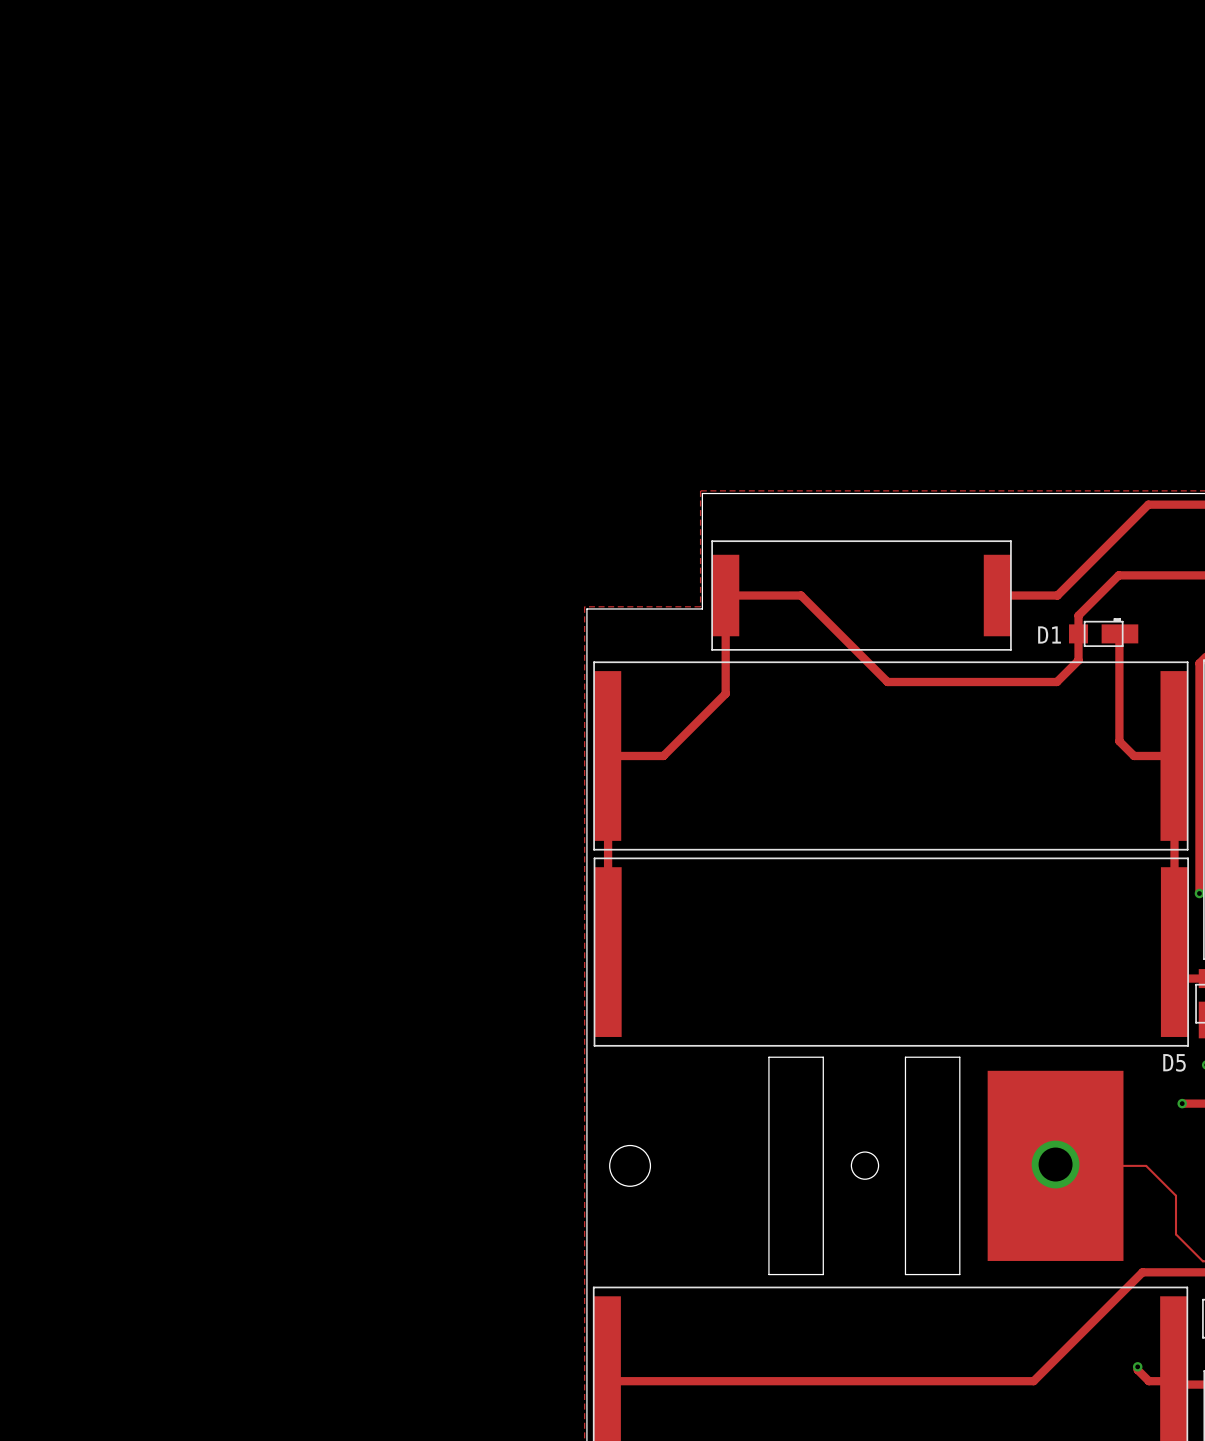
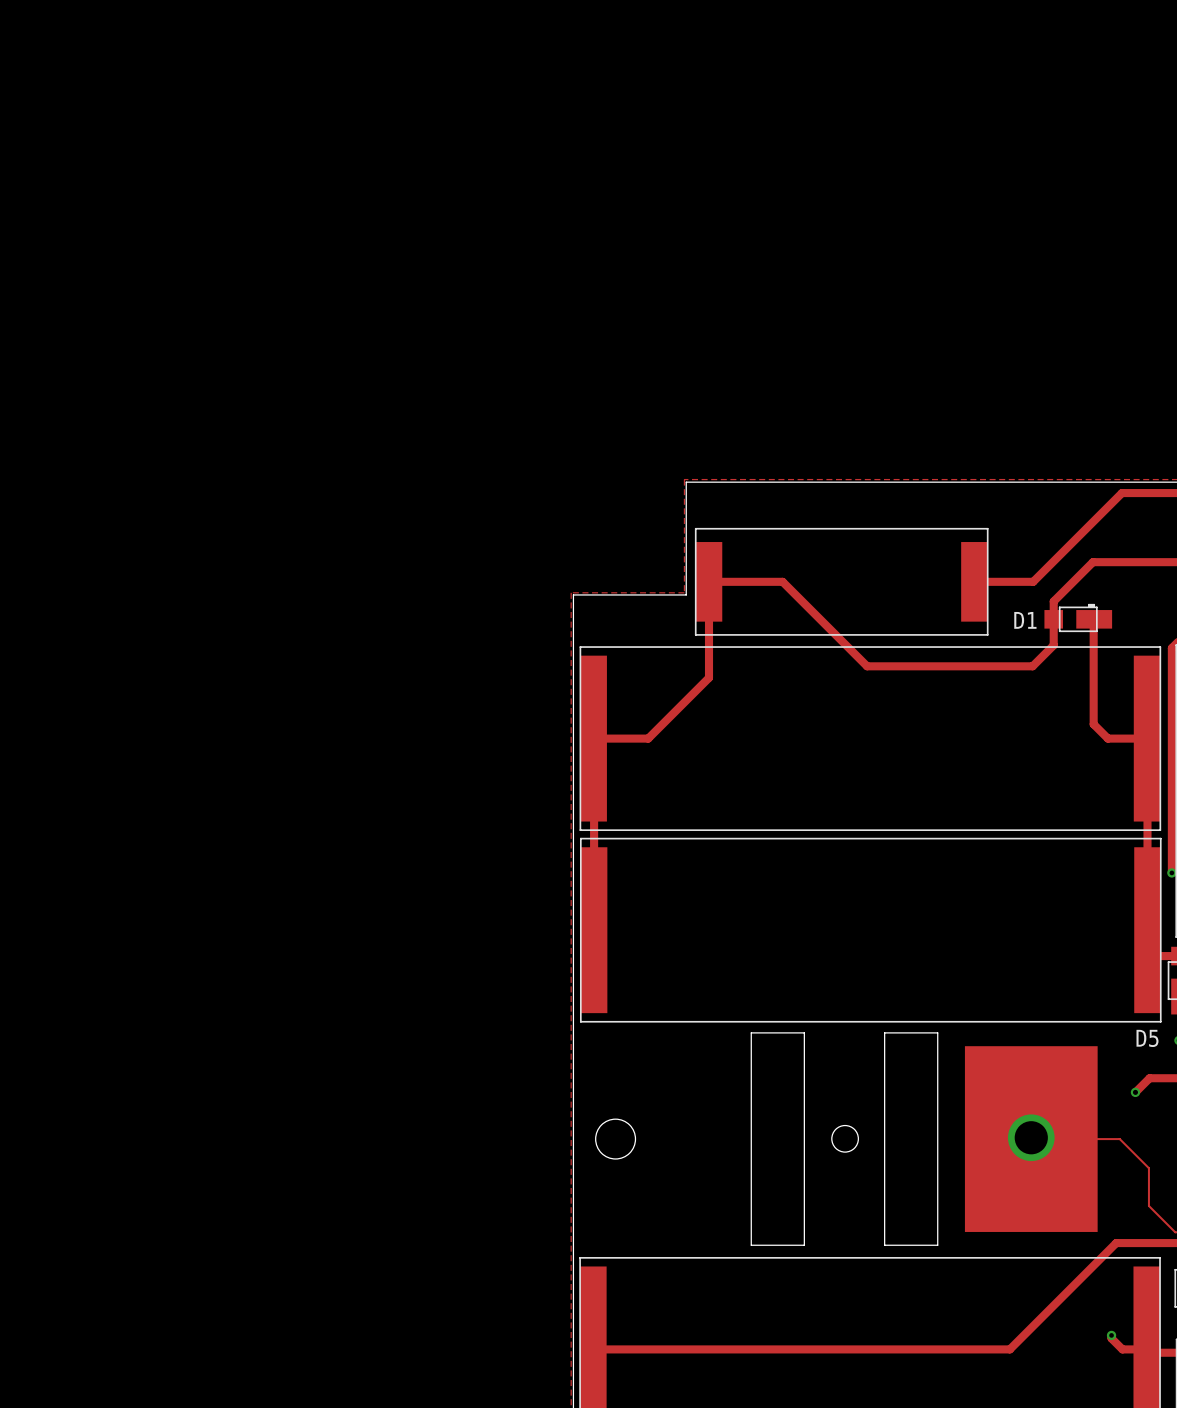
track: none -> (1155, 1078) (1149, 1078) (1135, 1092)
via: (1182, 1103) -> none
via: none -> (1135, 1092)

